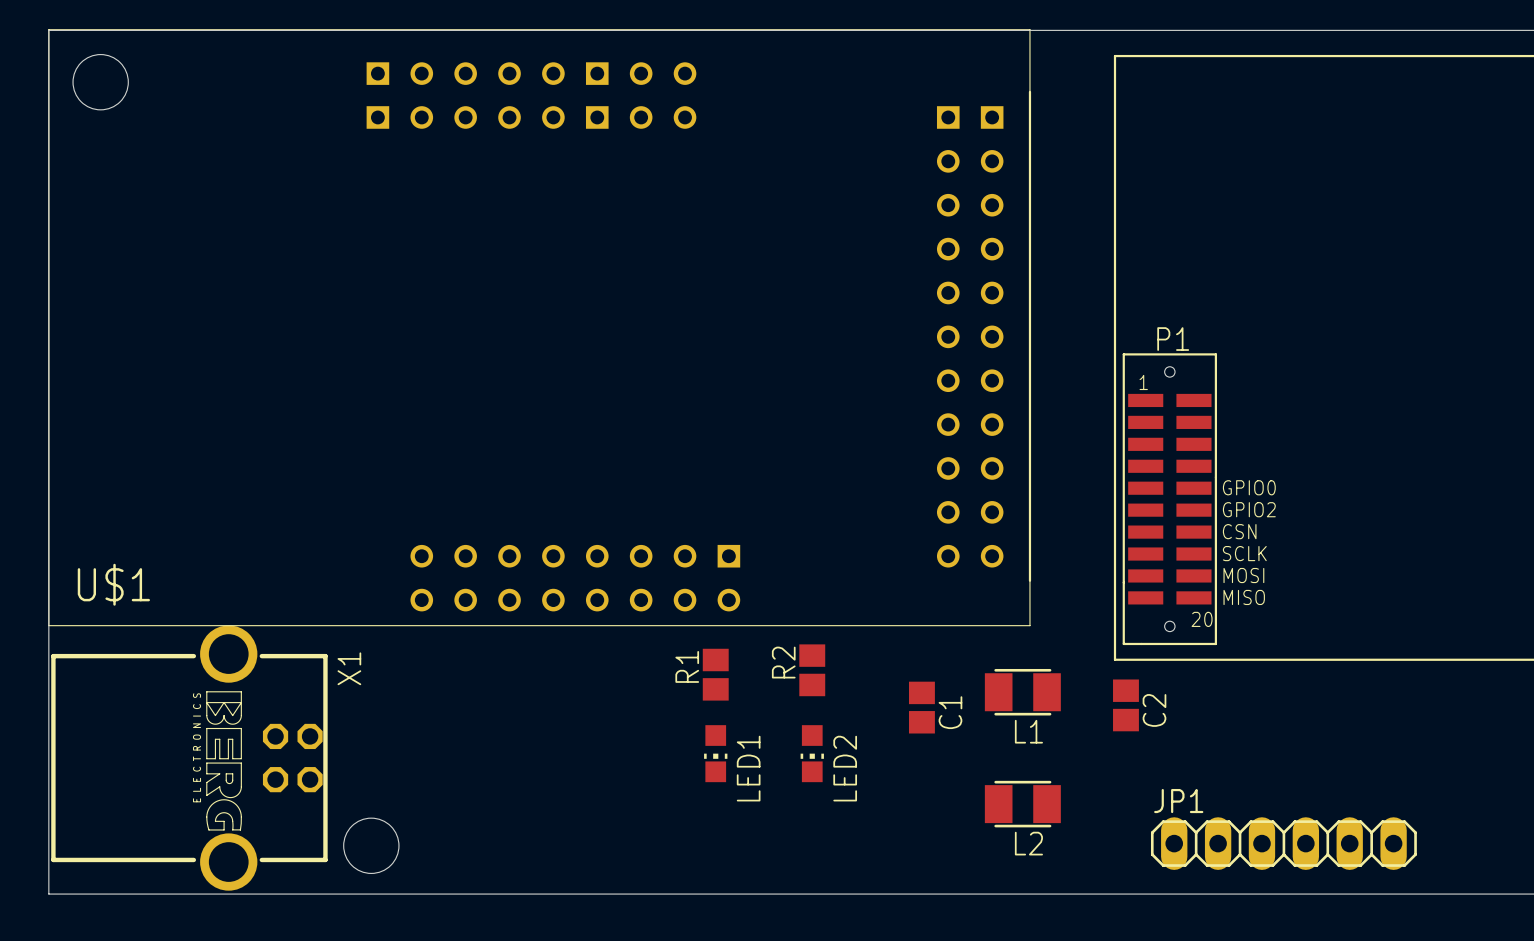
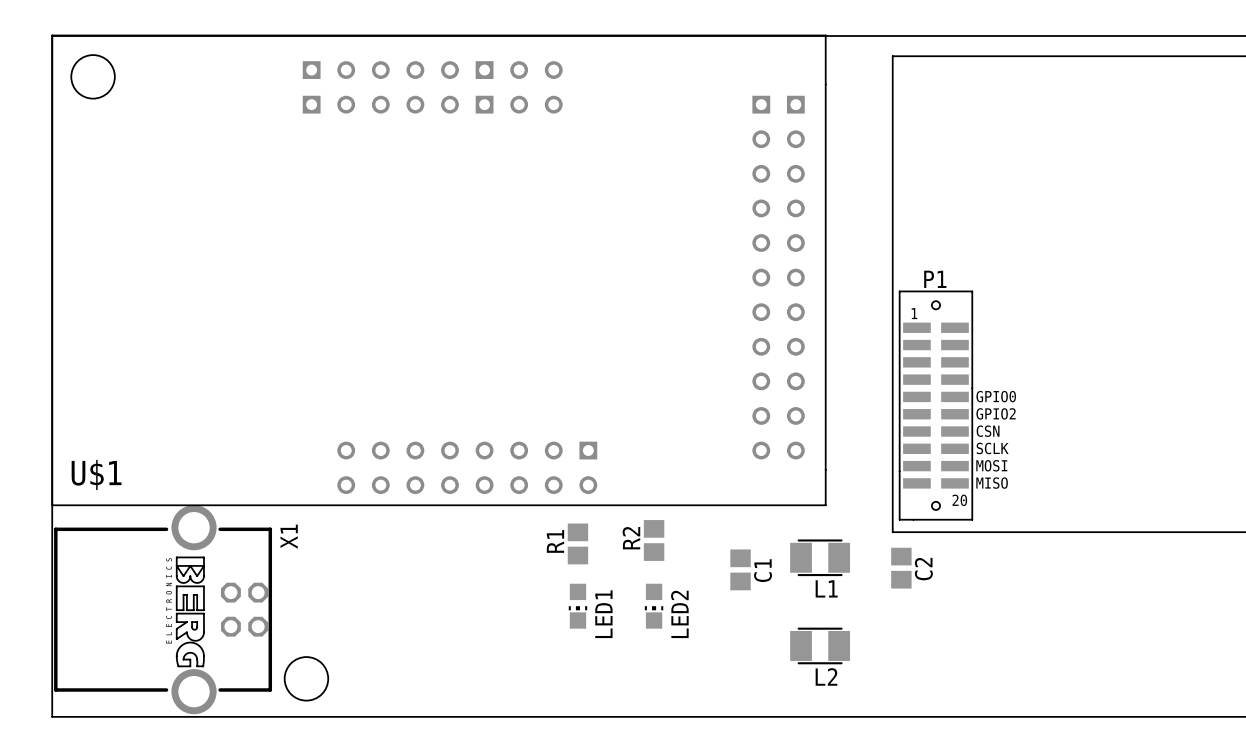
JP1: (1283, 843) -> none

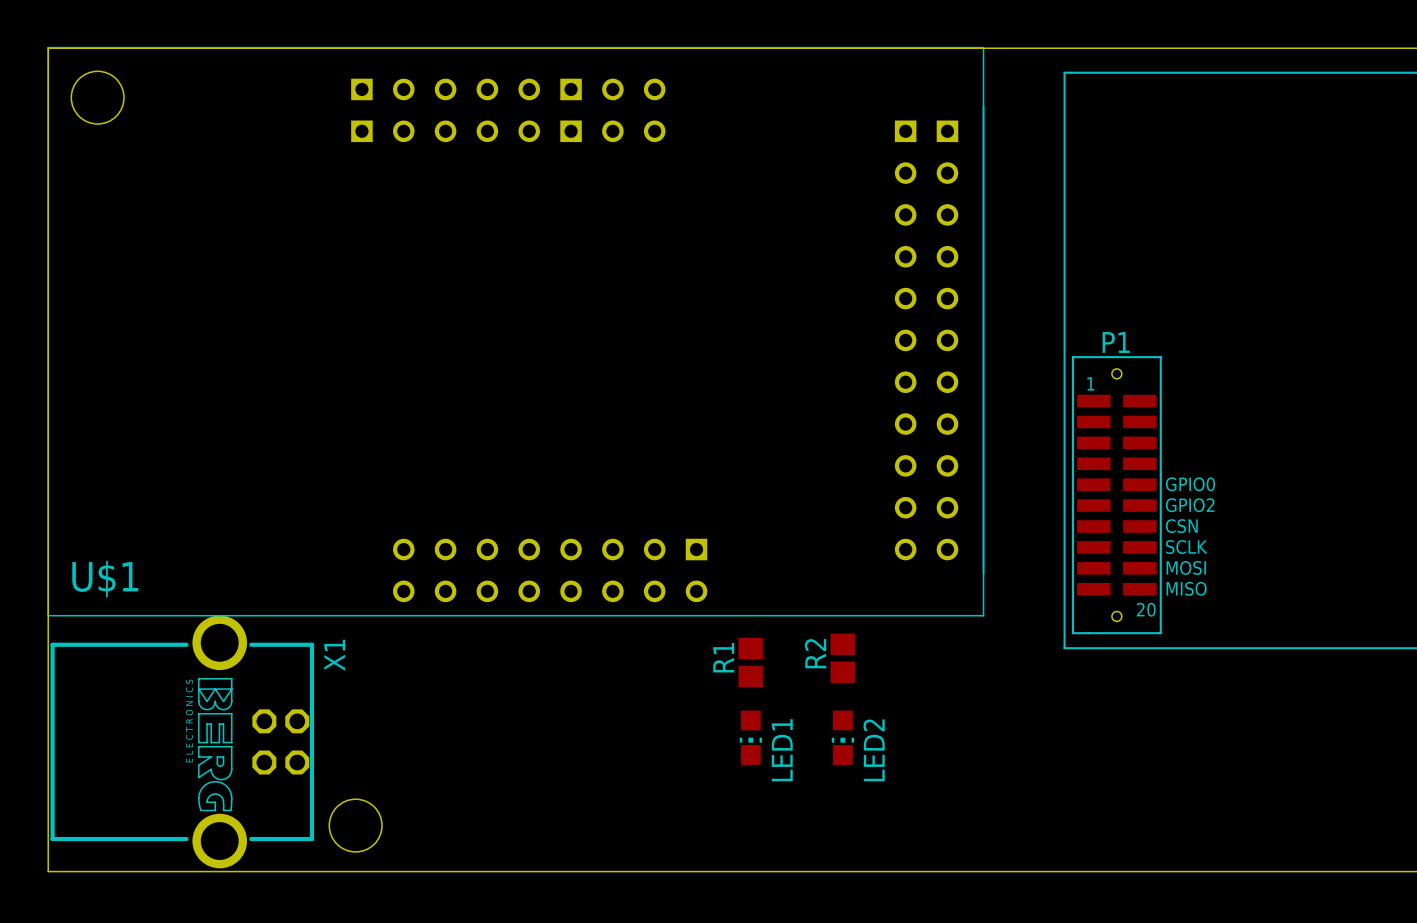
R2 position: (654, 540) -> (842, 658)
R1 position: (577, 543) -> (750, 662)
L1: (820, 557) -> none
C2: (901, 568) -> none
C1: (740, 569) -> none
LED1 position: (577, 606) -> (750, 737)
LED2 position: (654, 606) -> (842, 737)
L2: (820, 645) -> none

